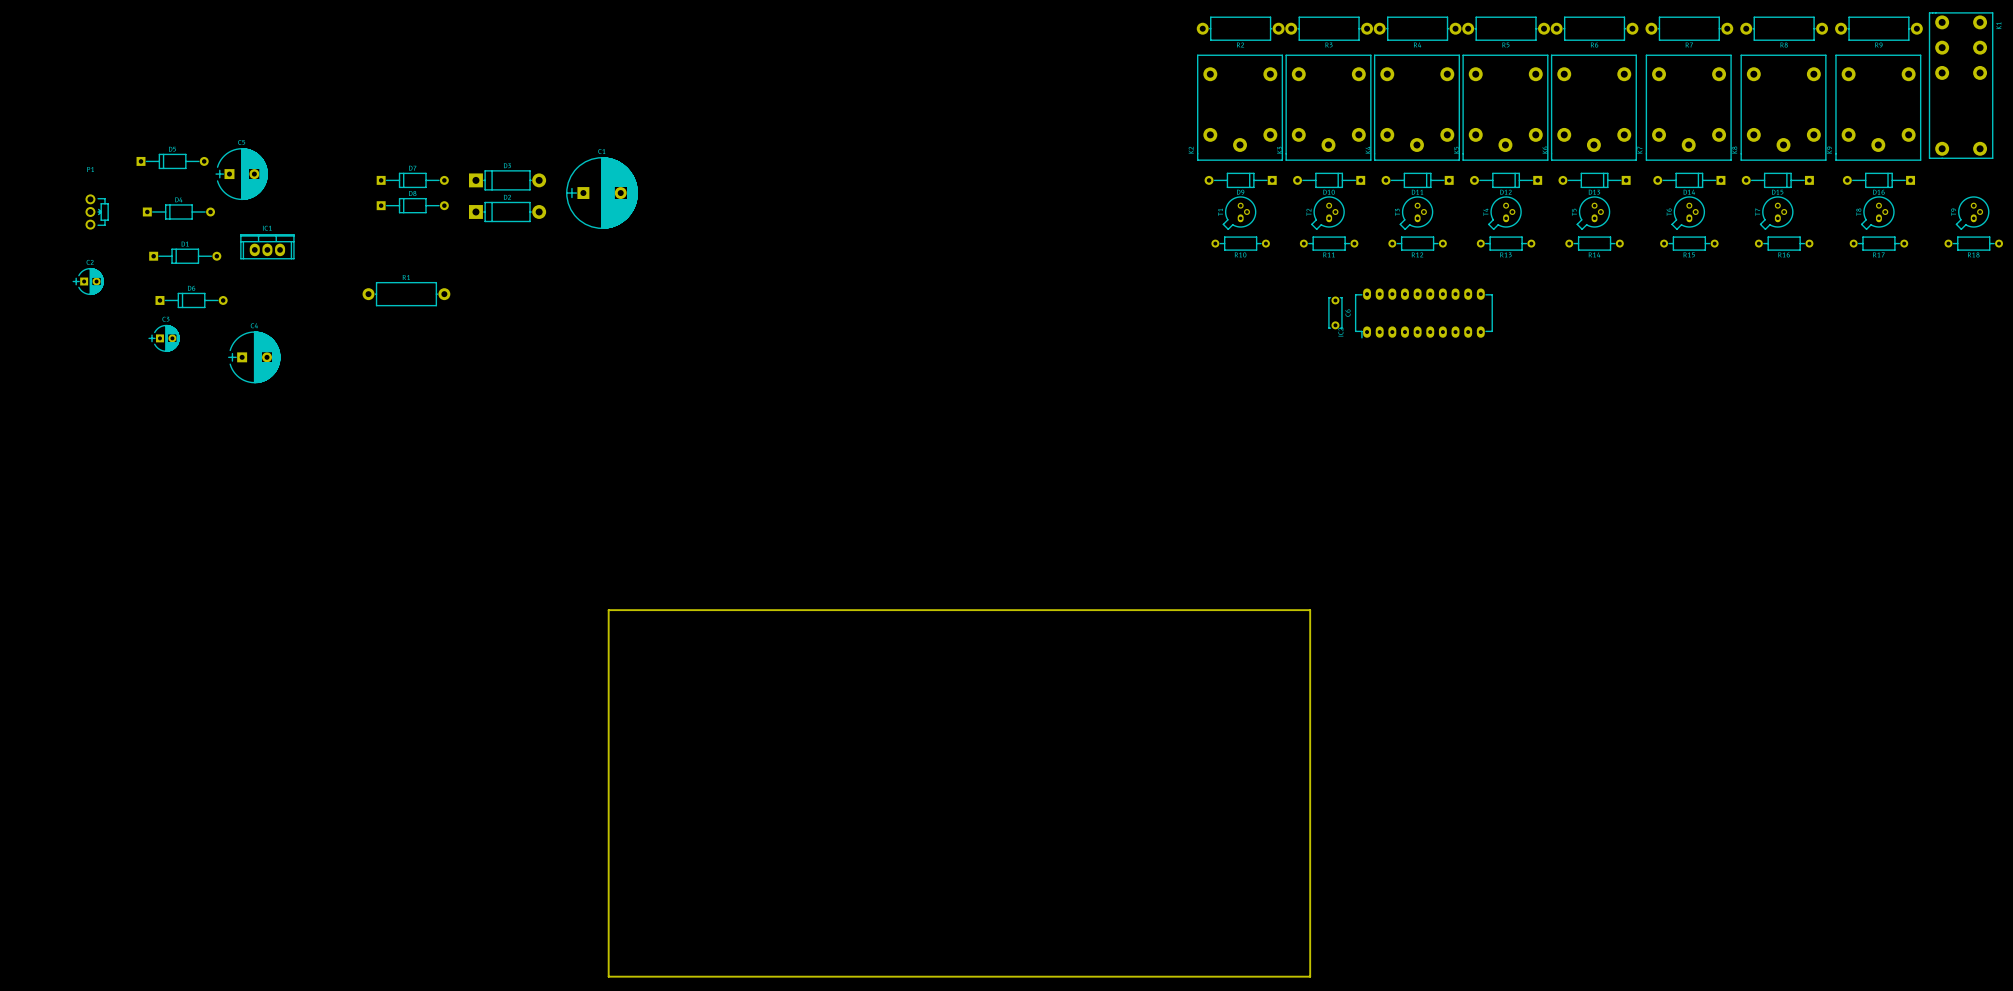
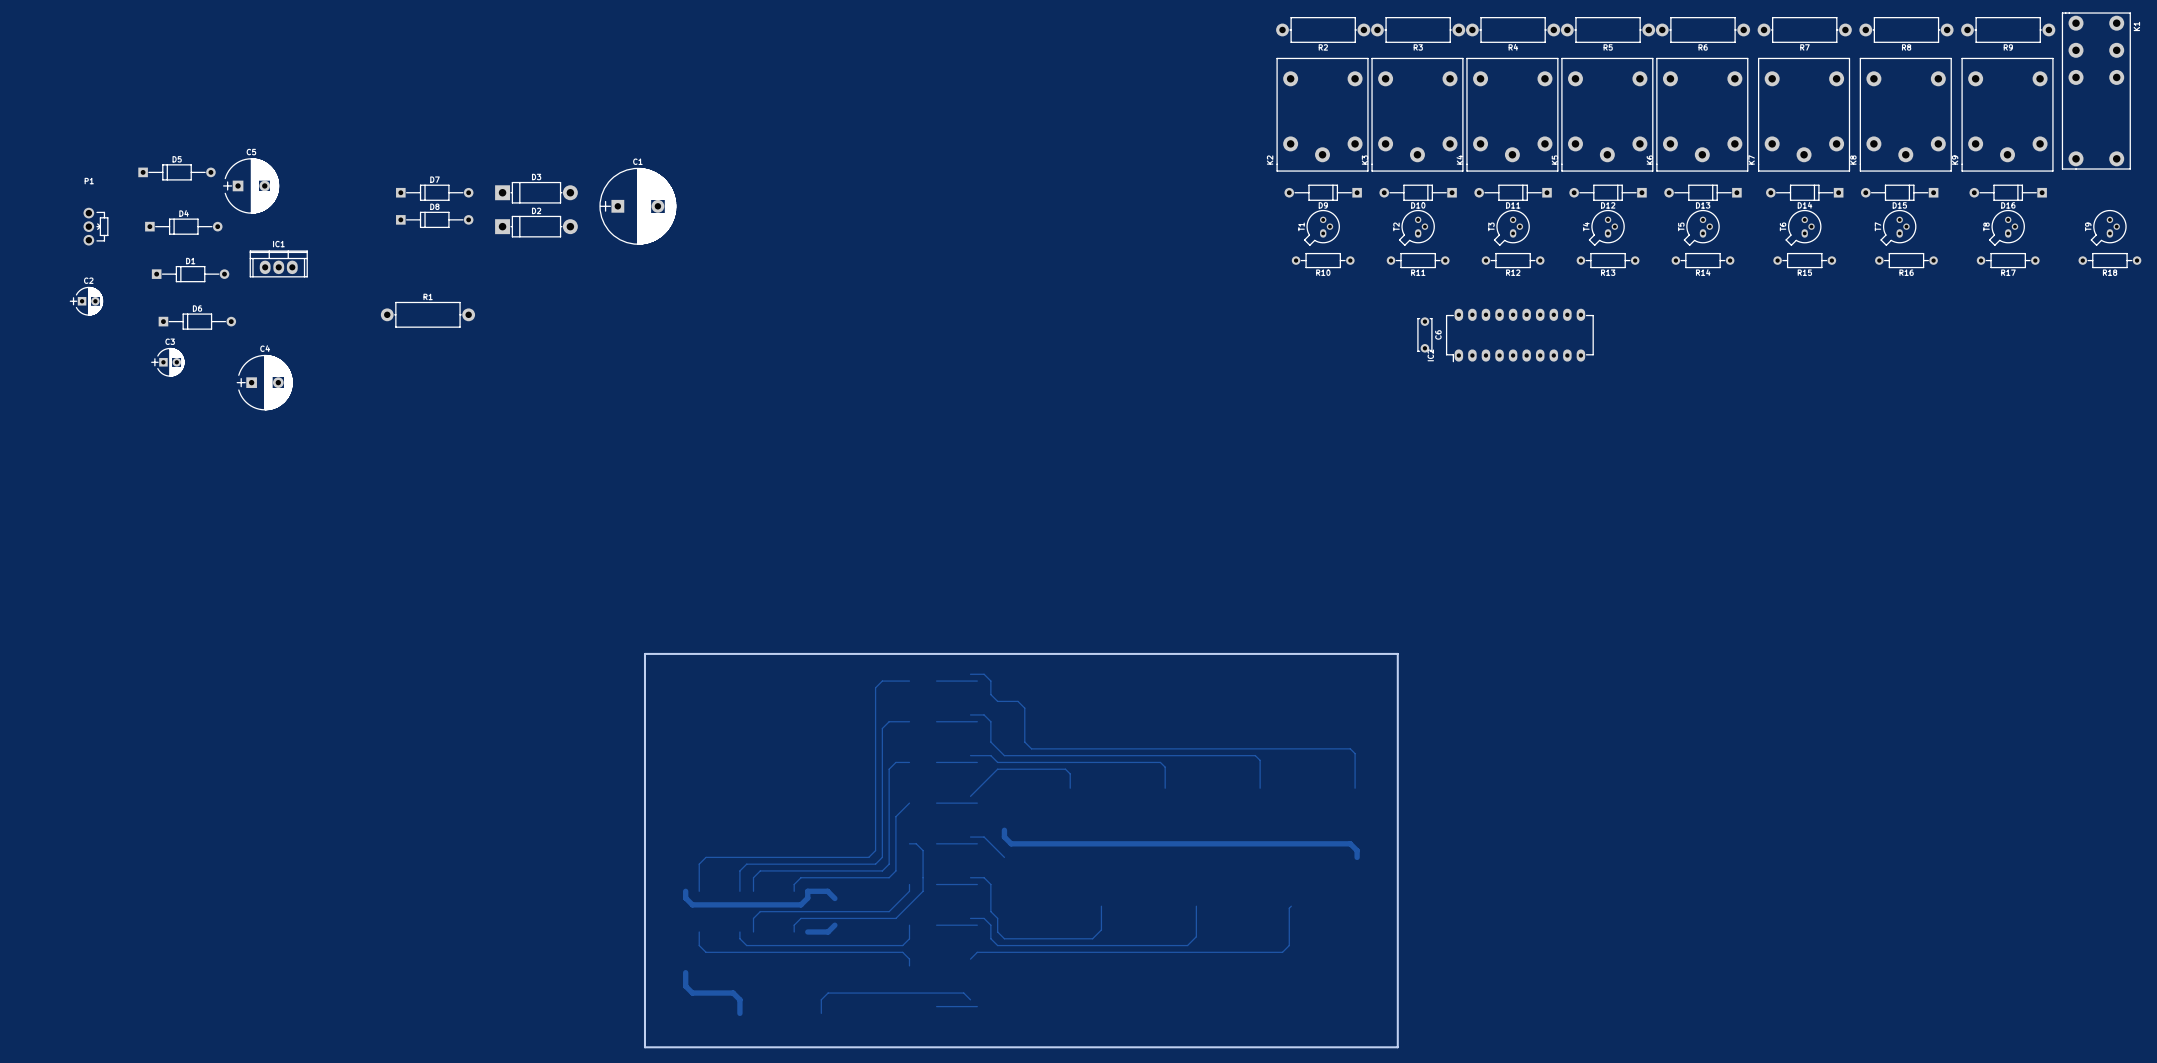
track: none -> (970, 674) (984, 674) (990, 681) (990, 694) (997, 701) (1018, 701) (1024, 708) (1024, 742) (1031, 748) (1350, 748) (1355, 753) (1355, 788)
track: none -> (909, 681) (882, 681) (875, 687) (875, 850) (868, 857) (706, 857) (699, 864) (699, 891)
track: none -> (936, 681) (977, 681)
track: none -> (970, 714) (984, 714) (990, 721) (990, 742) (1004, 755) (1255, 755) (1260, 760) (1260, 788)
track: none -> (909, 721) (889, 721) (882, 728) (882, 857) (875, 864) (746, 864) (739, 870) (739, 891)
track: none -> (936, 721) (977, 721)
track: none -> (970, 755) (990, 755) (997, 762) (1160, 762) (1165, 767) (1165, 788)
track: none -> (909, 762) (895, 762) (889, 769) (889, 864) (882, 870) (760, 870) (753, 877) (753, 891)
track: none -> (936, 762) (977, 762)
track: none -> (1070, 788) (1070, 773) (1065, 769) (997, 769) (970, 796)
track: none -> (909, 803) (895, 816) (895, 870) (889, 877) (800, 877) (794, 884) (794, 891)
track: none -> (936, 803) (977, 803)
track: none -> (1004, 830) (1004, 837) (1011, 843) (1350, 843) (1357, 850) (1357, 857)
track: none -> (970, 837) (984, 837) (1004, 857)
track: none -> (909, 843) (916, 843) (923, 850) (923, 891) (895, 918) (800, 918) (794, 925) (794, 931)
track: none -> (936, 843) (977, 843)
track: none -> (970, 877) (984, 877) (990, 884) (990, 911) (997, 918) (997, 931) (1004, 938) (1092, 938) (1101, 929) (1101, 906)
track: none -> (909, 884) (909, 891) (889, 911) (760, 911) (753, 918) (753, 931)
track: none -> (936, 884) (977, 884)
track: none -> (685, 891) (685, 898) (692, 904) (800, 904) (807, 898) (807, 891) (827, 891) (834, 898)
track: none -> (1196, 906) (1196, 936) (1187, 945) (997, 945) (990, 938) (990, 925) (984, 918) (970, 918)
track: none -> (1291, 906) (1289, 908) (1289, 945) (1282, 952) (977, 952) (970, 959)
track: none -> (834, 925) (828, 931) (807, 931)
track: none -> (909, 925) (909, 938) (902, 945) (746, 945) (739, 938) (739, 931)
track: none -> (936, 925) (977, 925)
track: none -> (699, 931) (699, 945) (706, 952) (902, 952) (909, 959) (909, 965)
track: none -> (685, 972) (685, 986) (692, 993) (733, 993) (739, 999) (739, 1013)
track: none -> (970, 999) (963, 993) (828, 993) (821, 999) (821, 1013)
track: none -> (936, 1006) (977, 1006)

